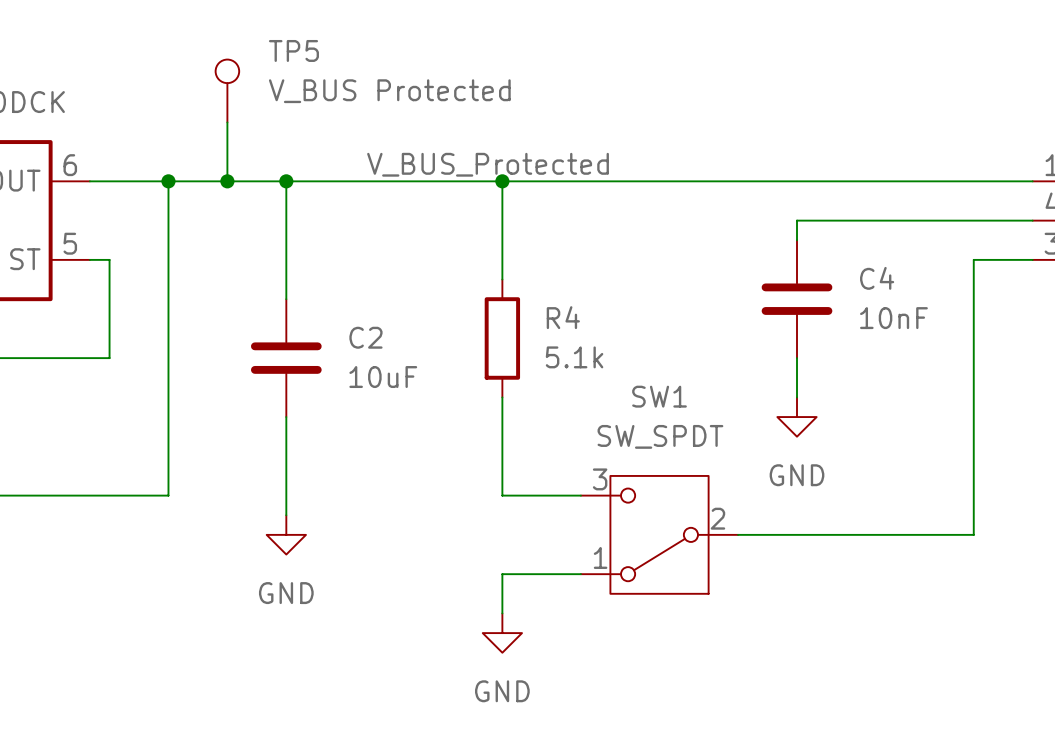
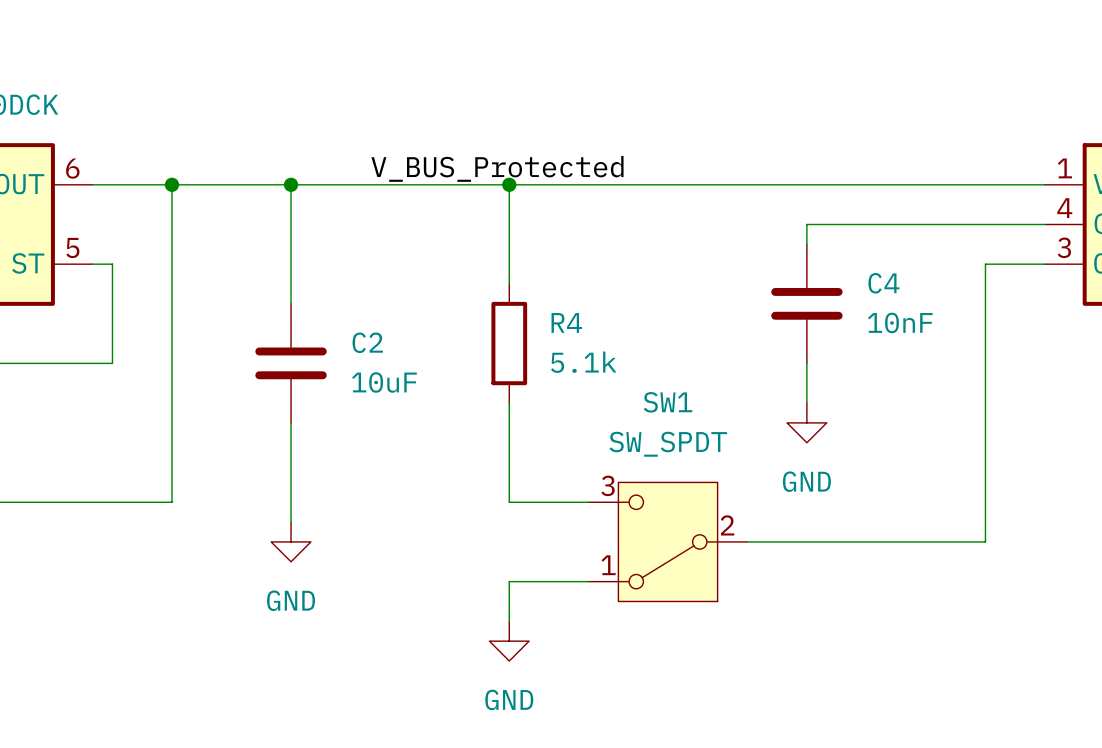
TP5: V_BUS Protected (227, 90) -> none
wire: (227, 122) (227, 181) -> none
junction: (227, 181) -> none

